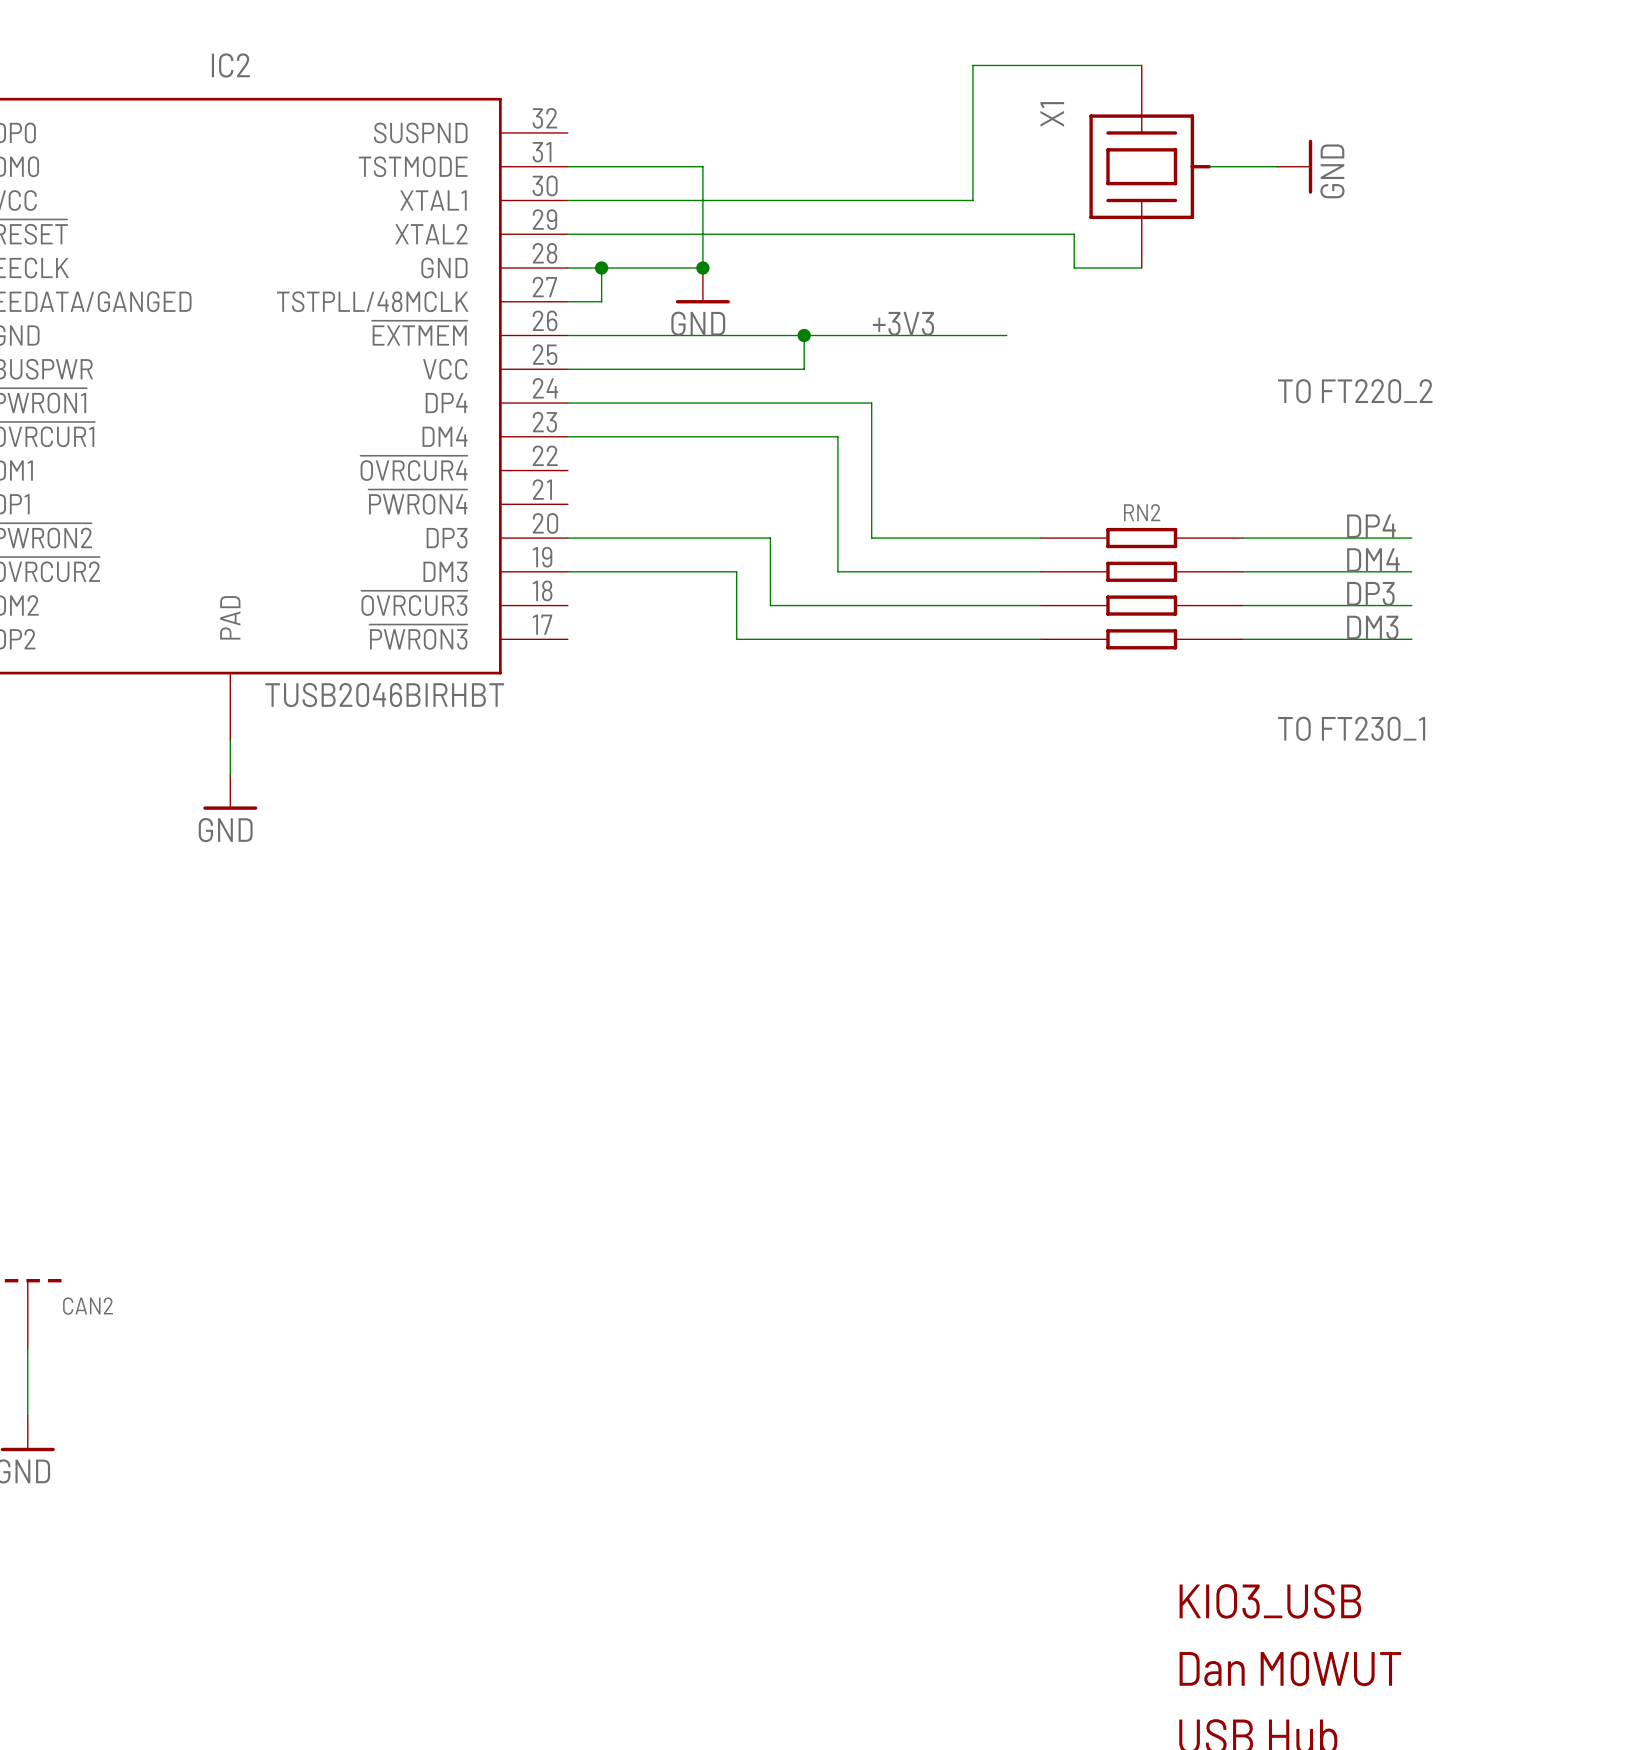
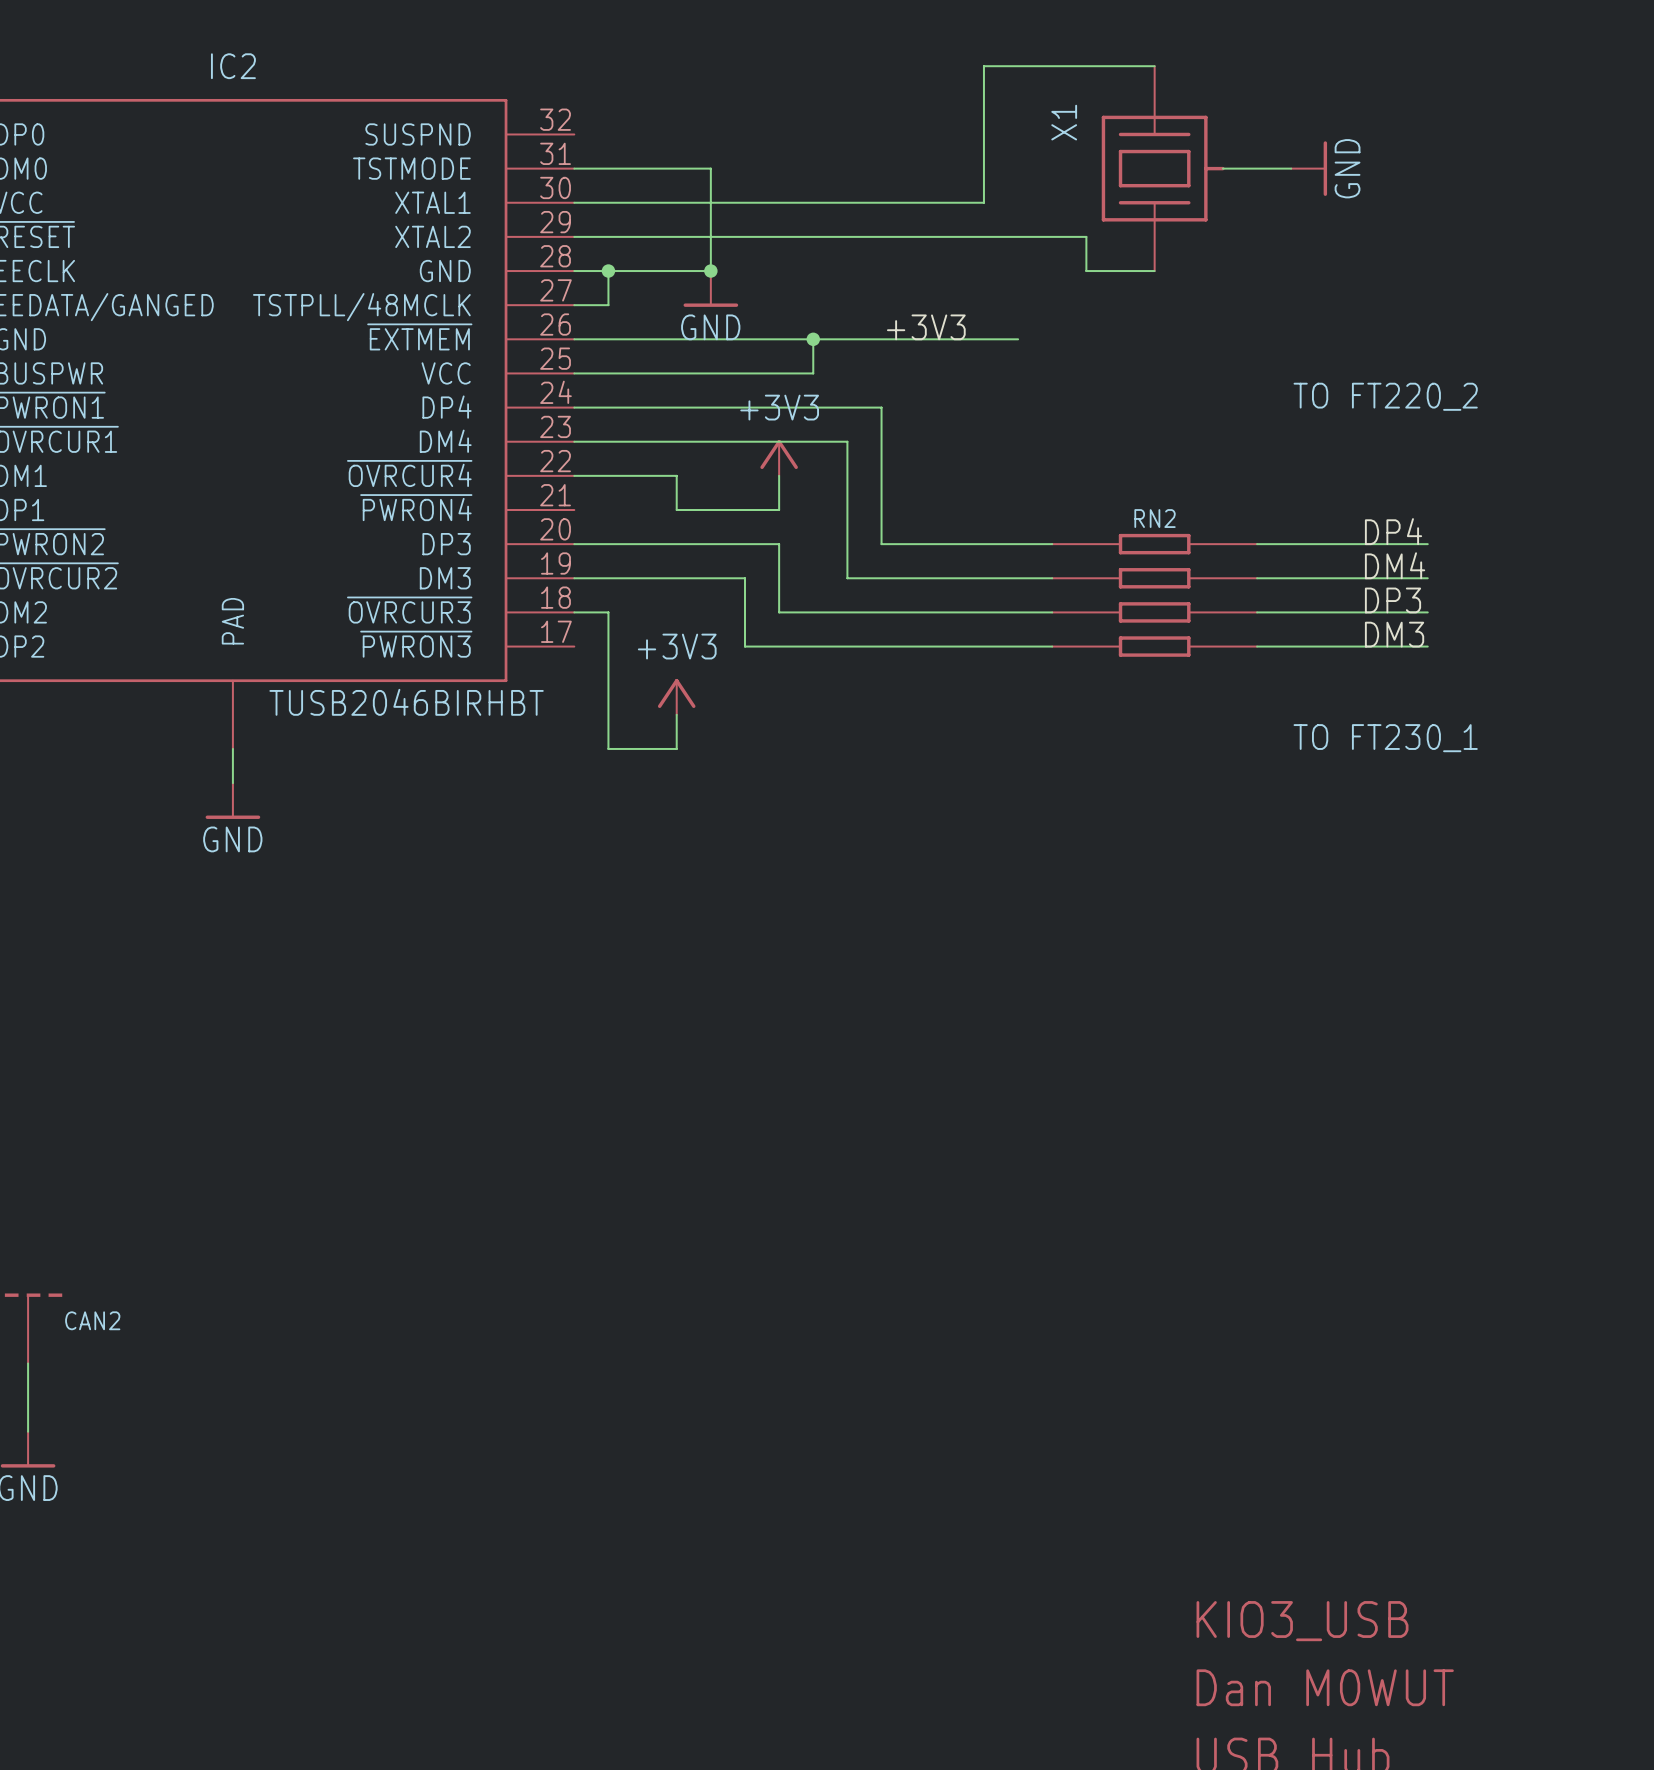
power symbol: none -> +3V3 (779, 457)
wire: none -> (574, 475) (676, 475) (676, 510) (779, 510) (779, 475)
wire: none -> (574, 612) (608, 612) (608, 748) (676, 748) (676, 714)
power symbol: none -> +3V3 (676, 696)

